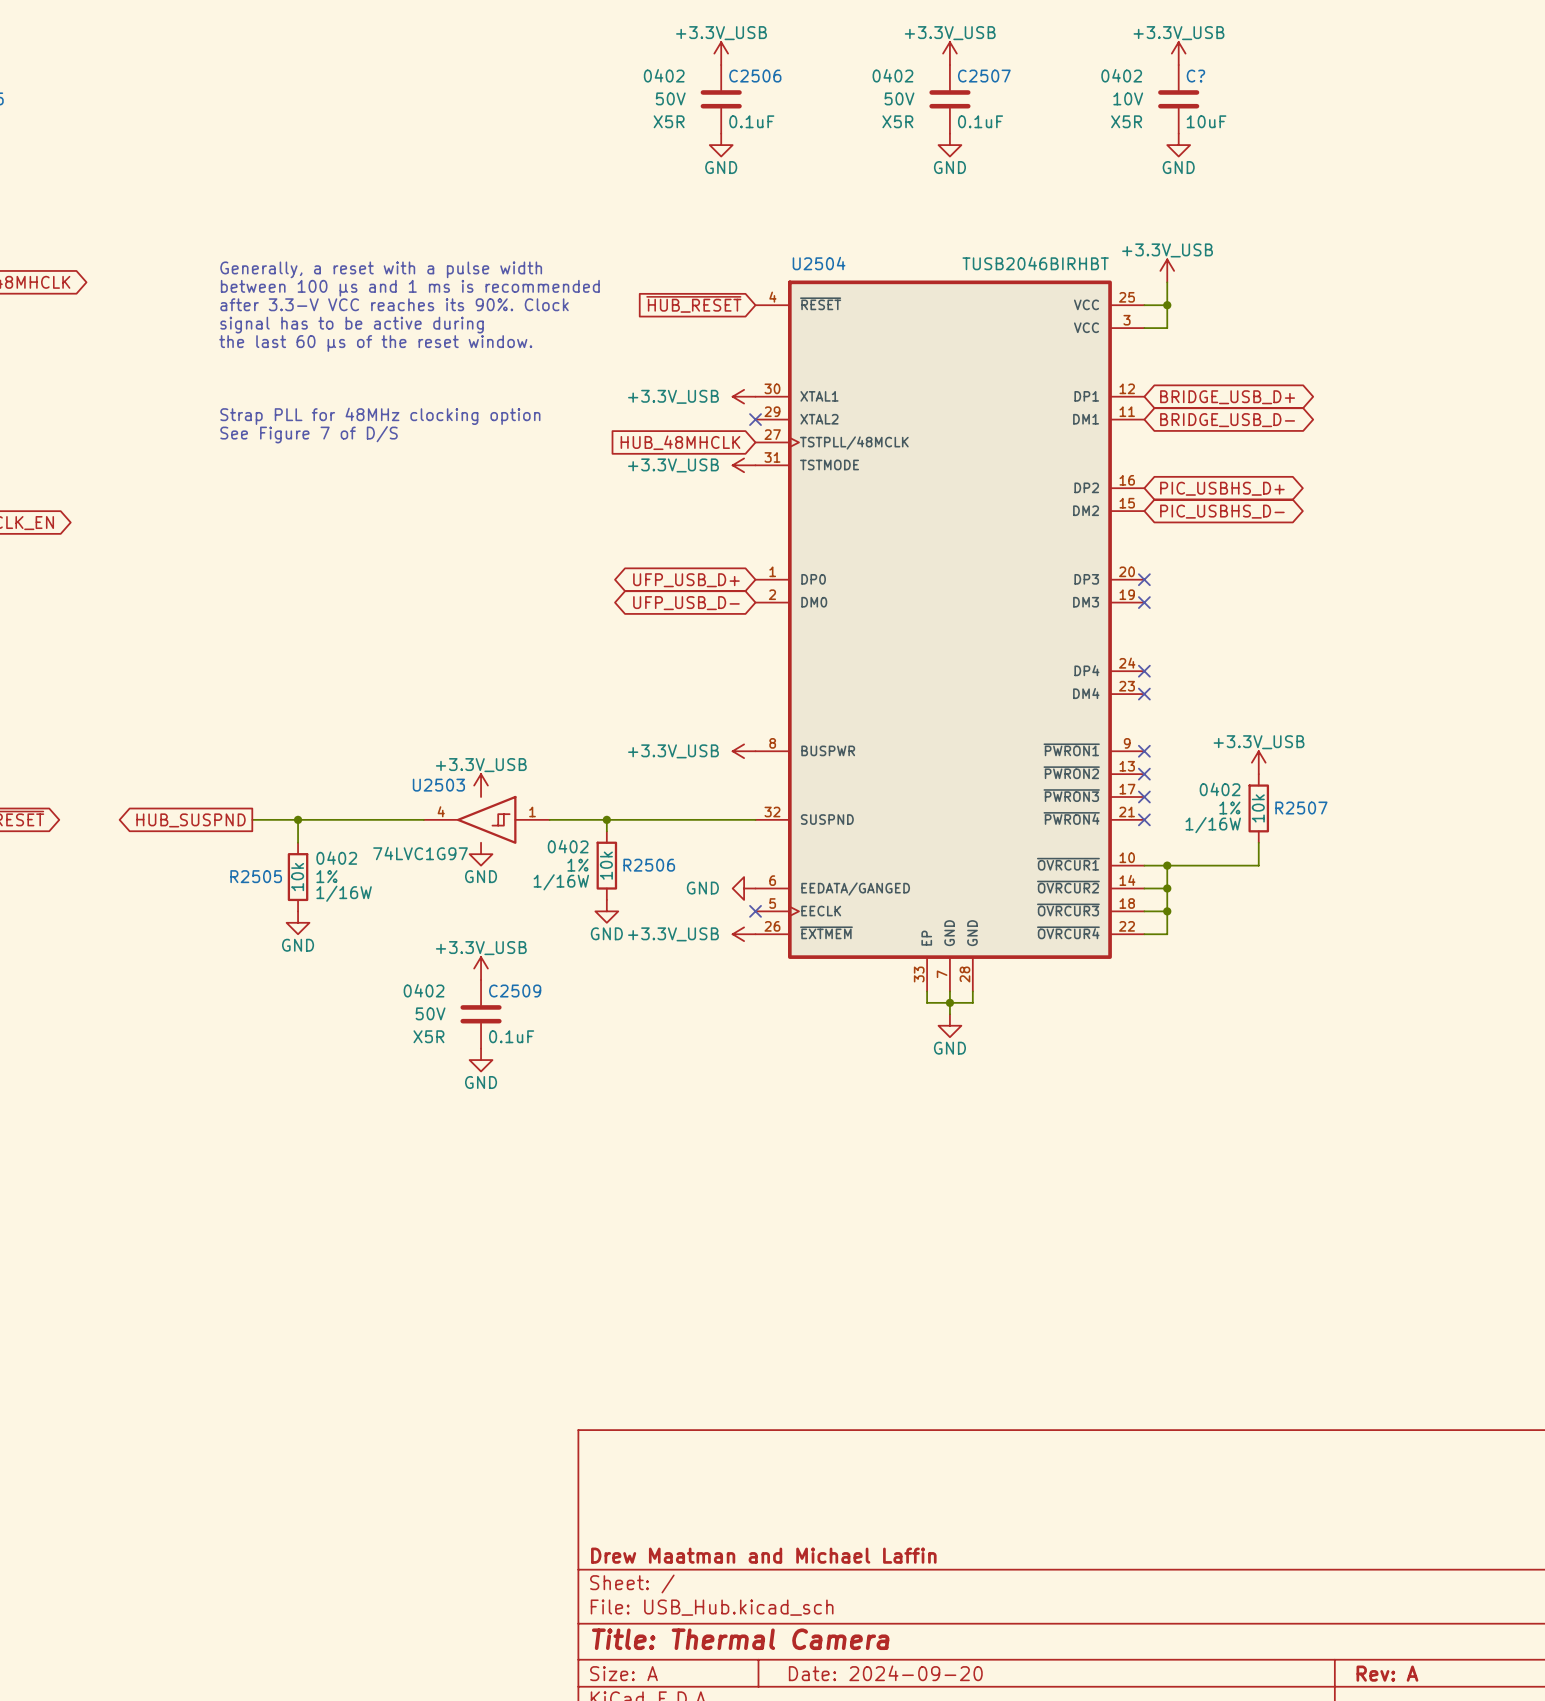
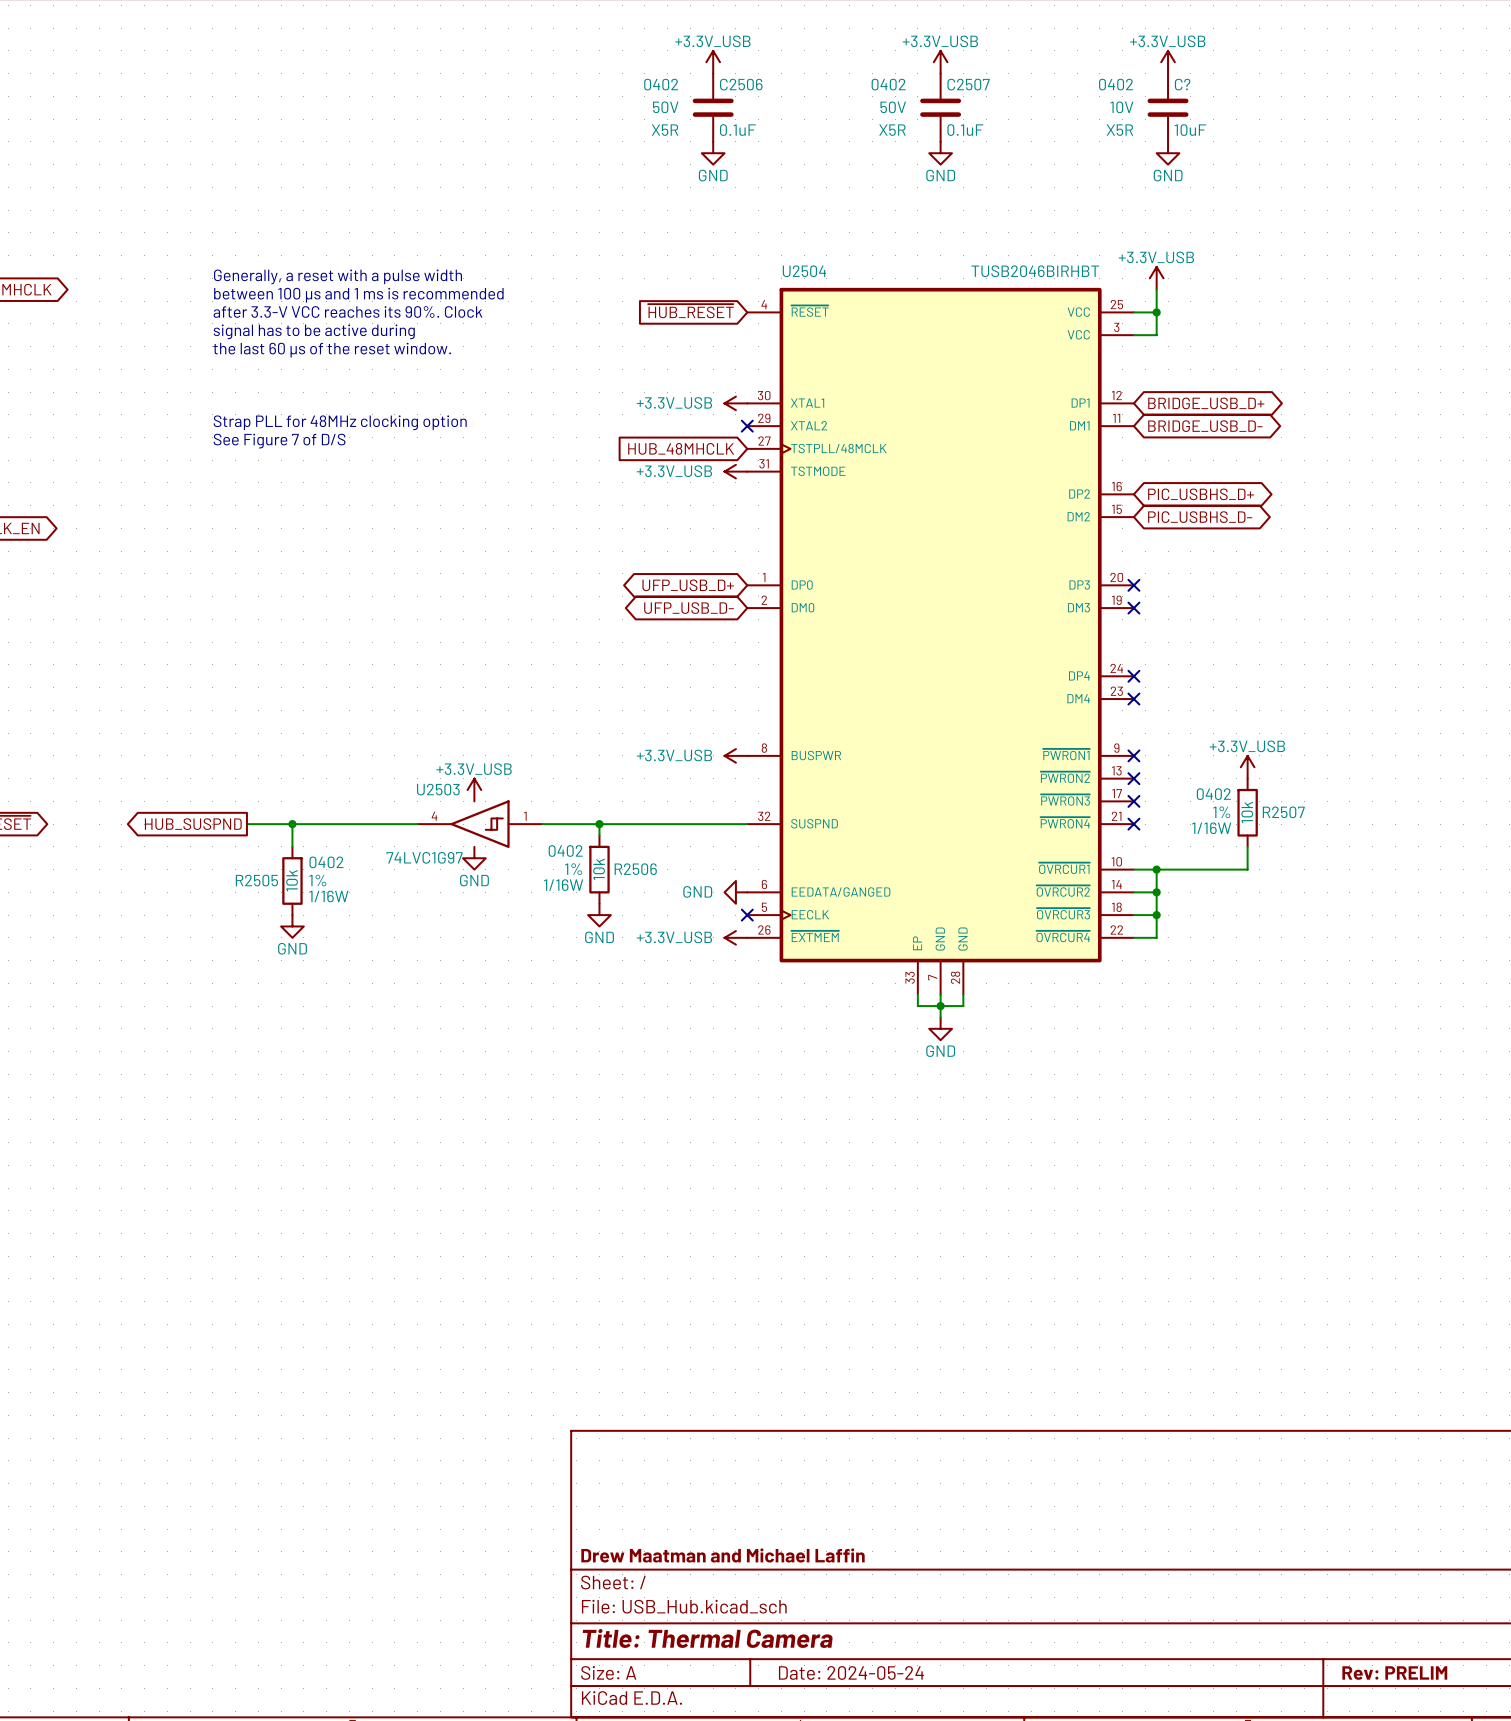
power symbol: +3.3V_USB (481, 968) -> none
C2509: 0.1uF (481, 1014) -> none
power symbol: GND (481, 1060) -> none
title block: Date: 2024-09-20 (885, 1673) -> Date: 2024-05-24 (851, 1672)
title block: Rev: A (1387, 1673) -> Rev: PRELIM (1394, 1673)

